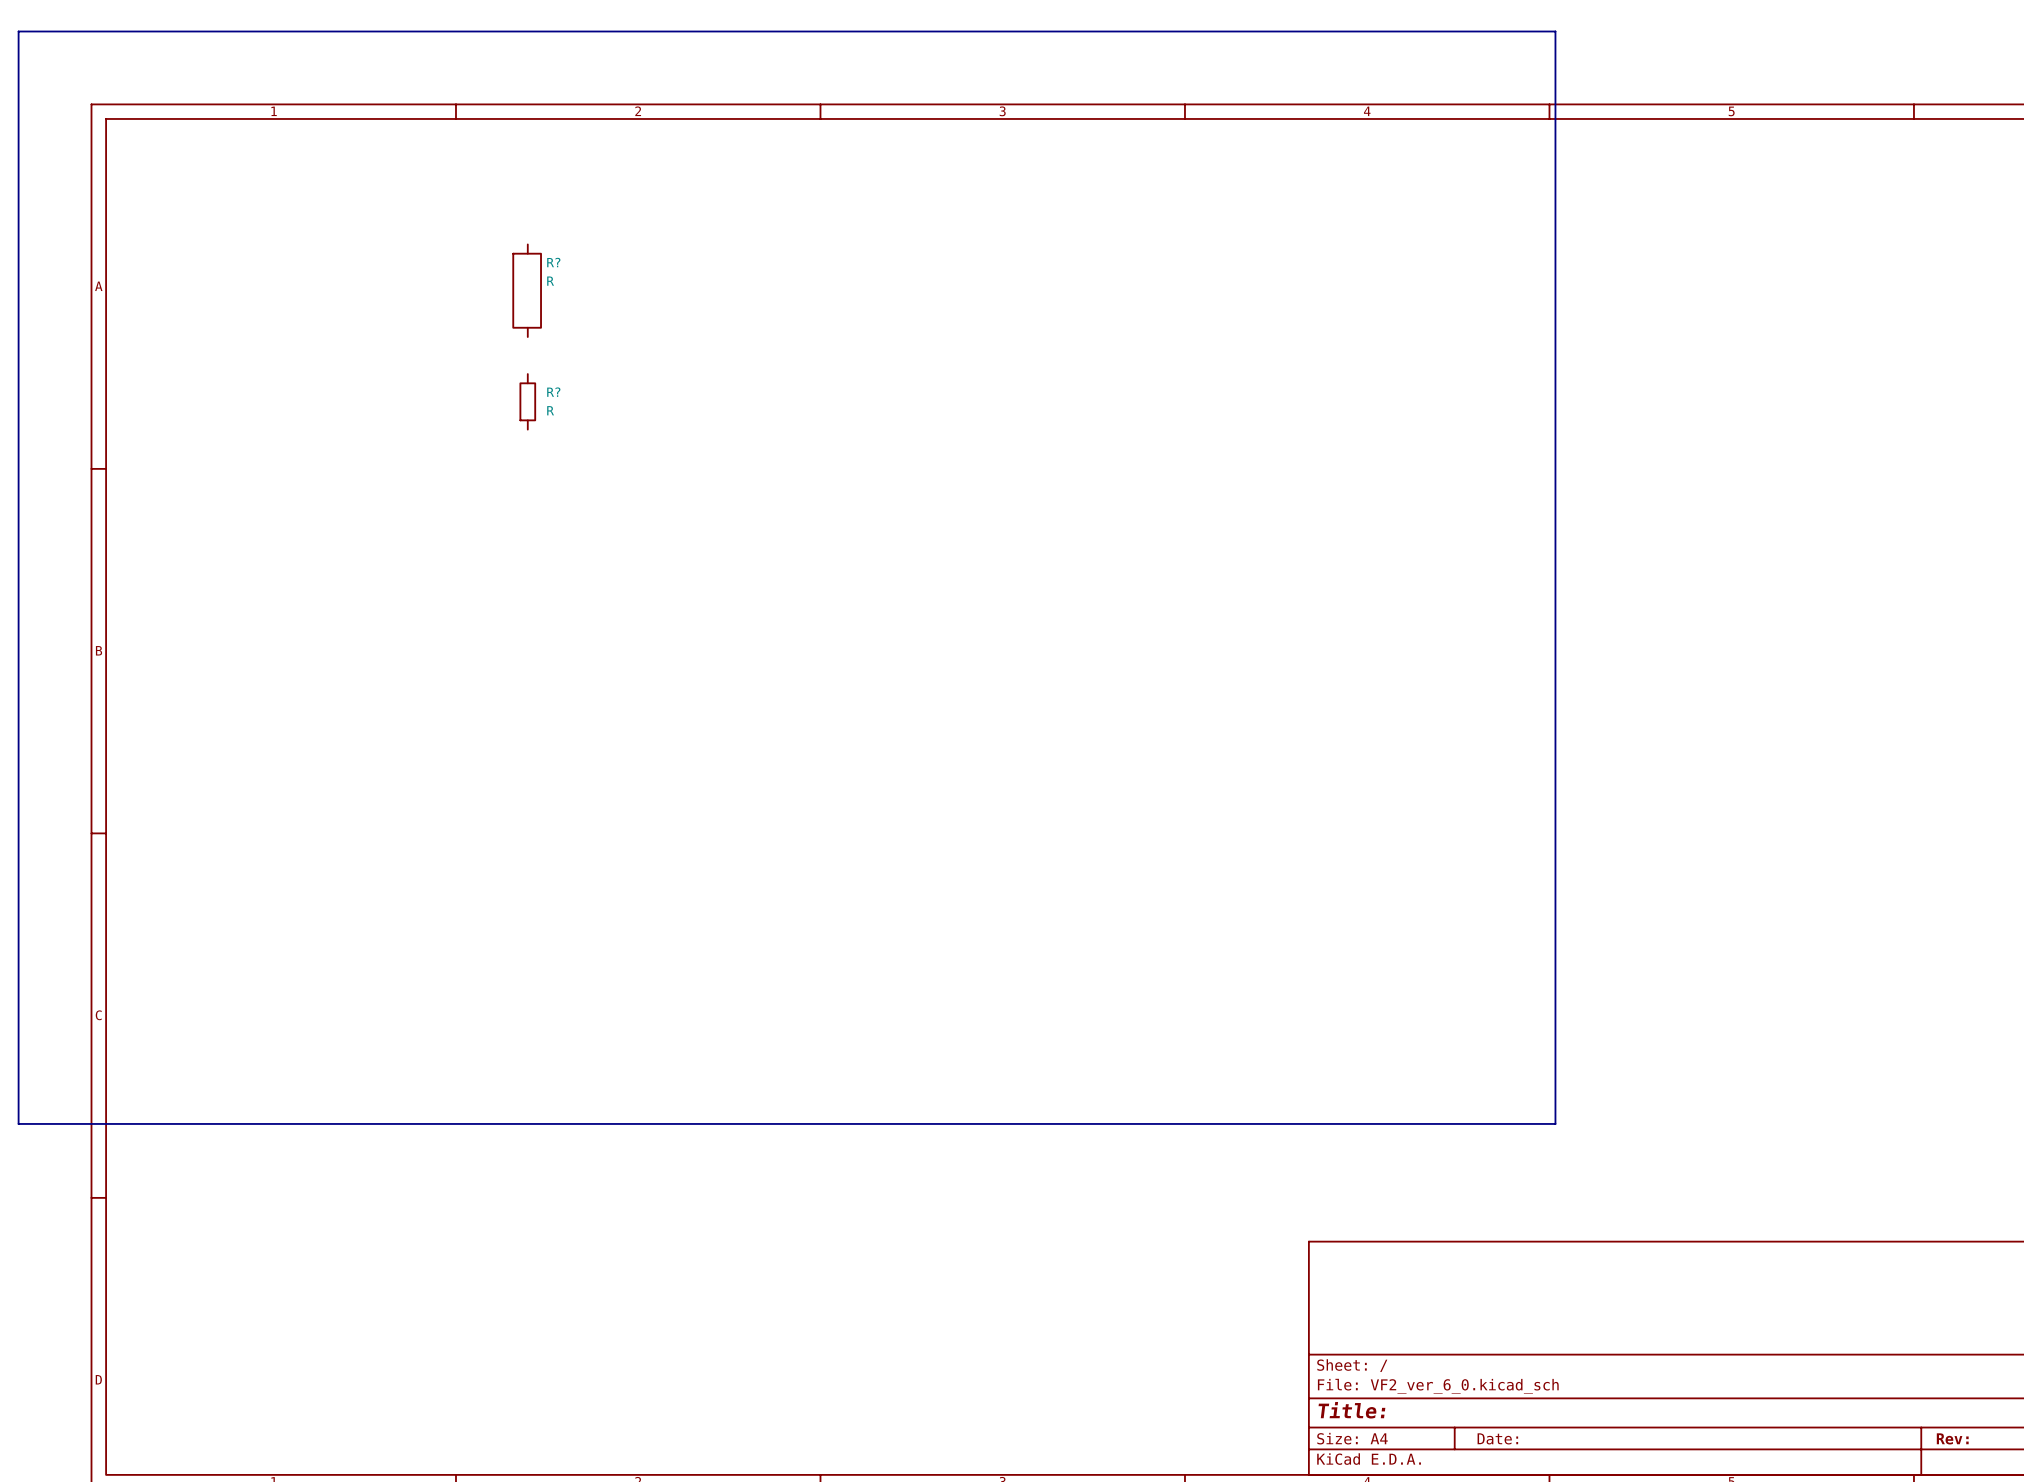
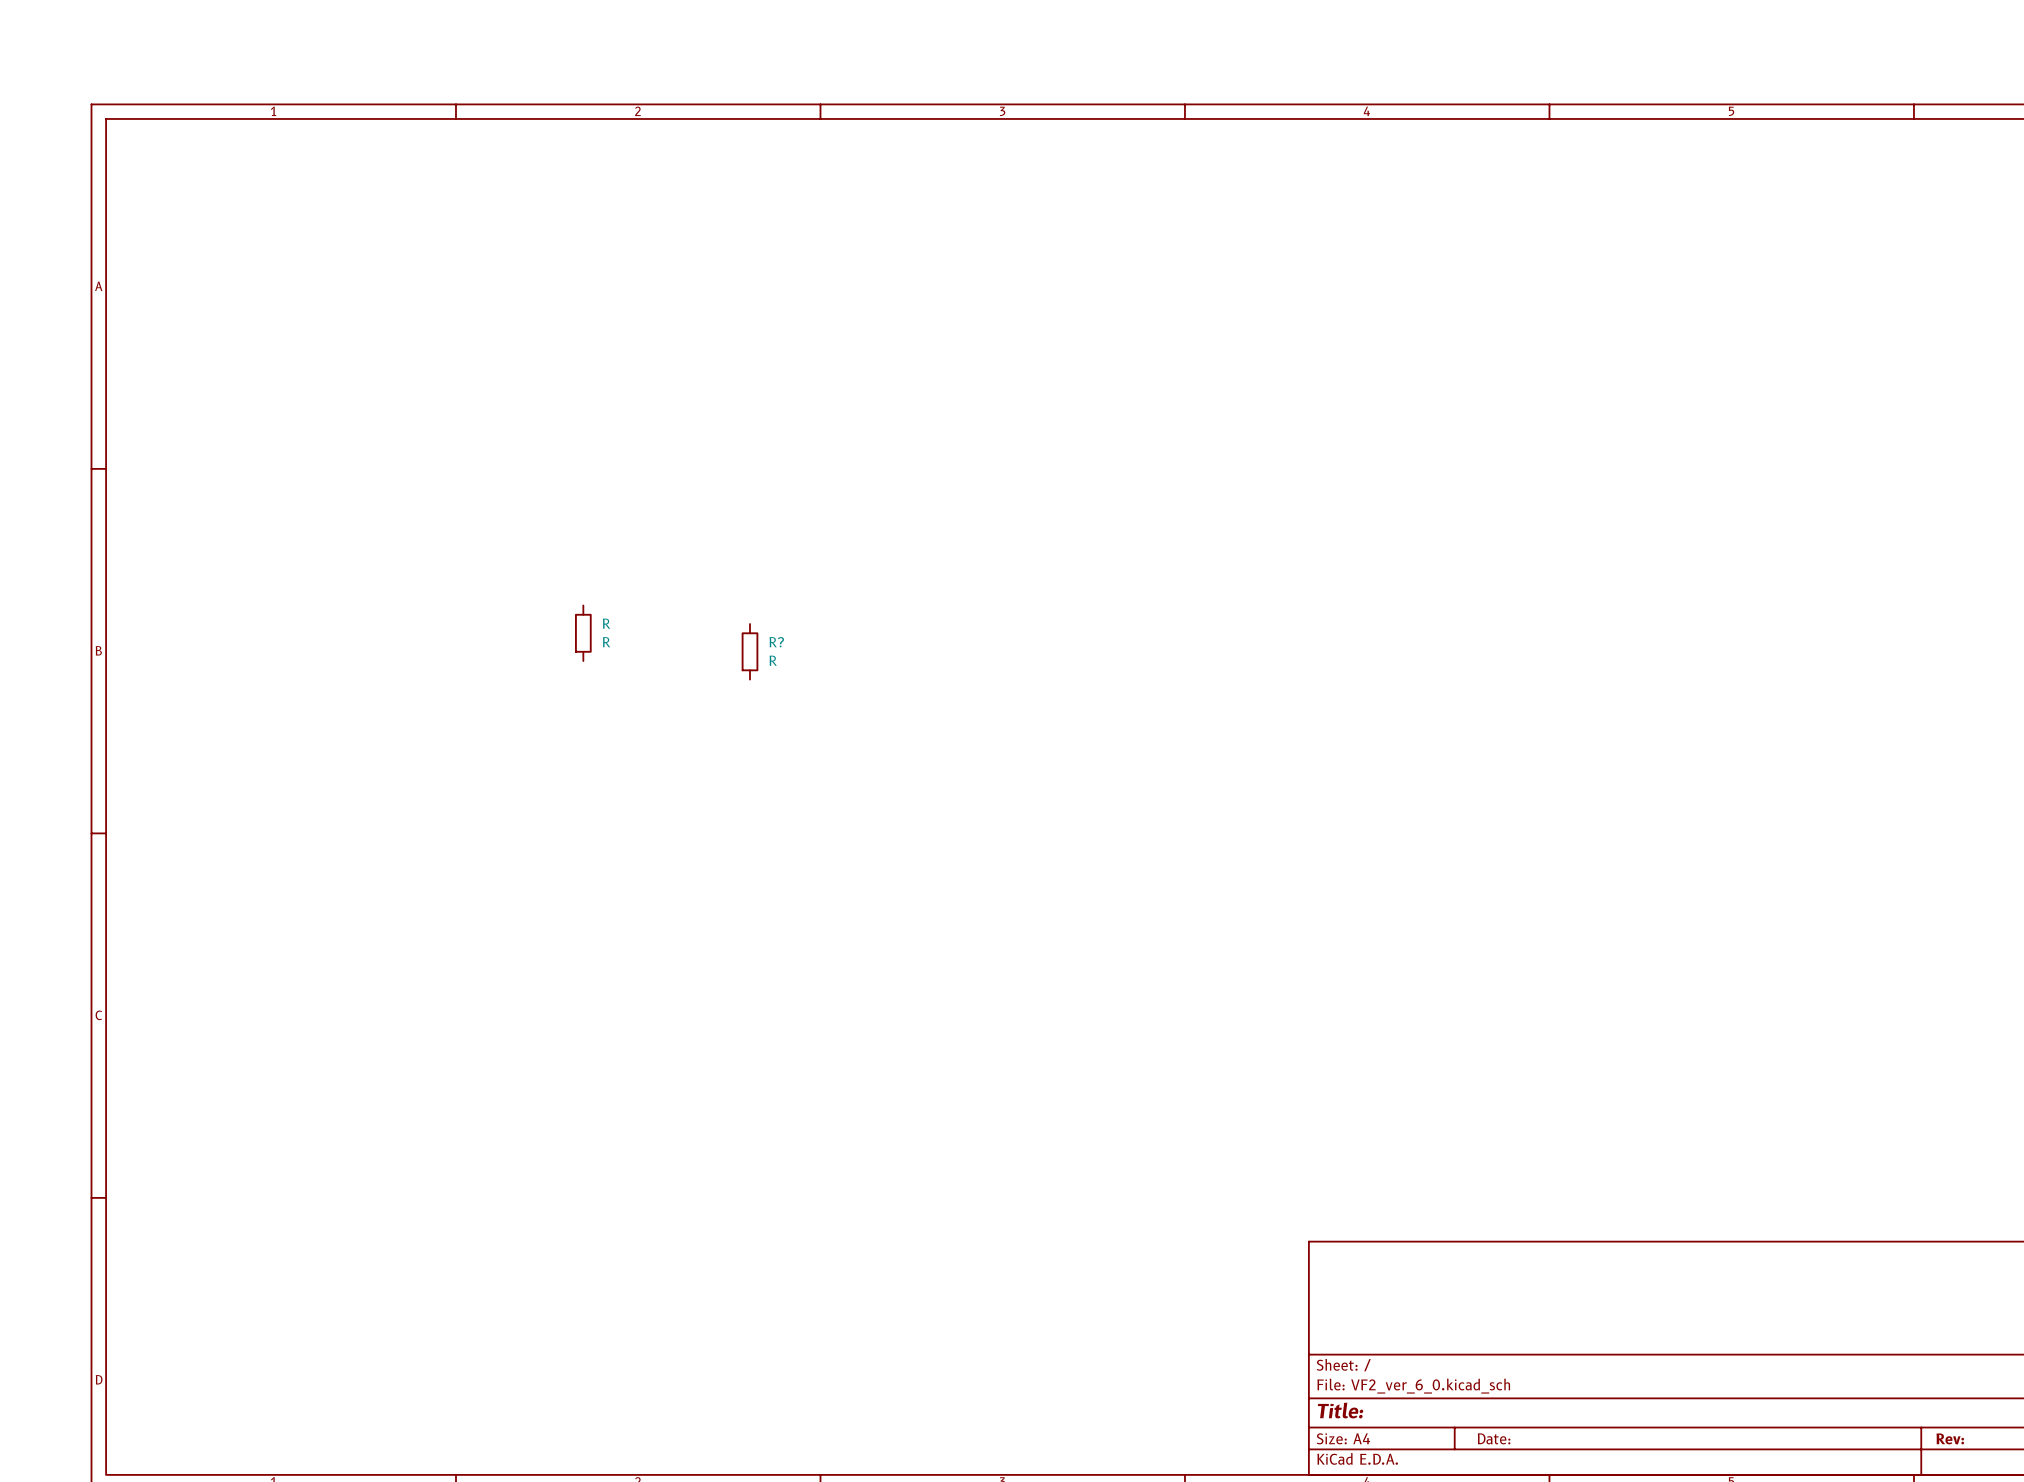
line: (18, 31) (18, 1123) (1555, 1123) (1555, 31) (18, 31) -> none
R?: R (527, 290) -> none
R?: R (527, 401) -> none
R: none -> R (583, 633)
R?: none -> R (749, 651)

